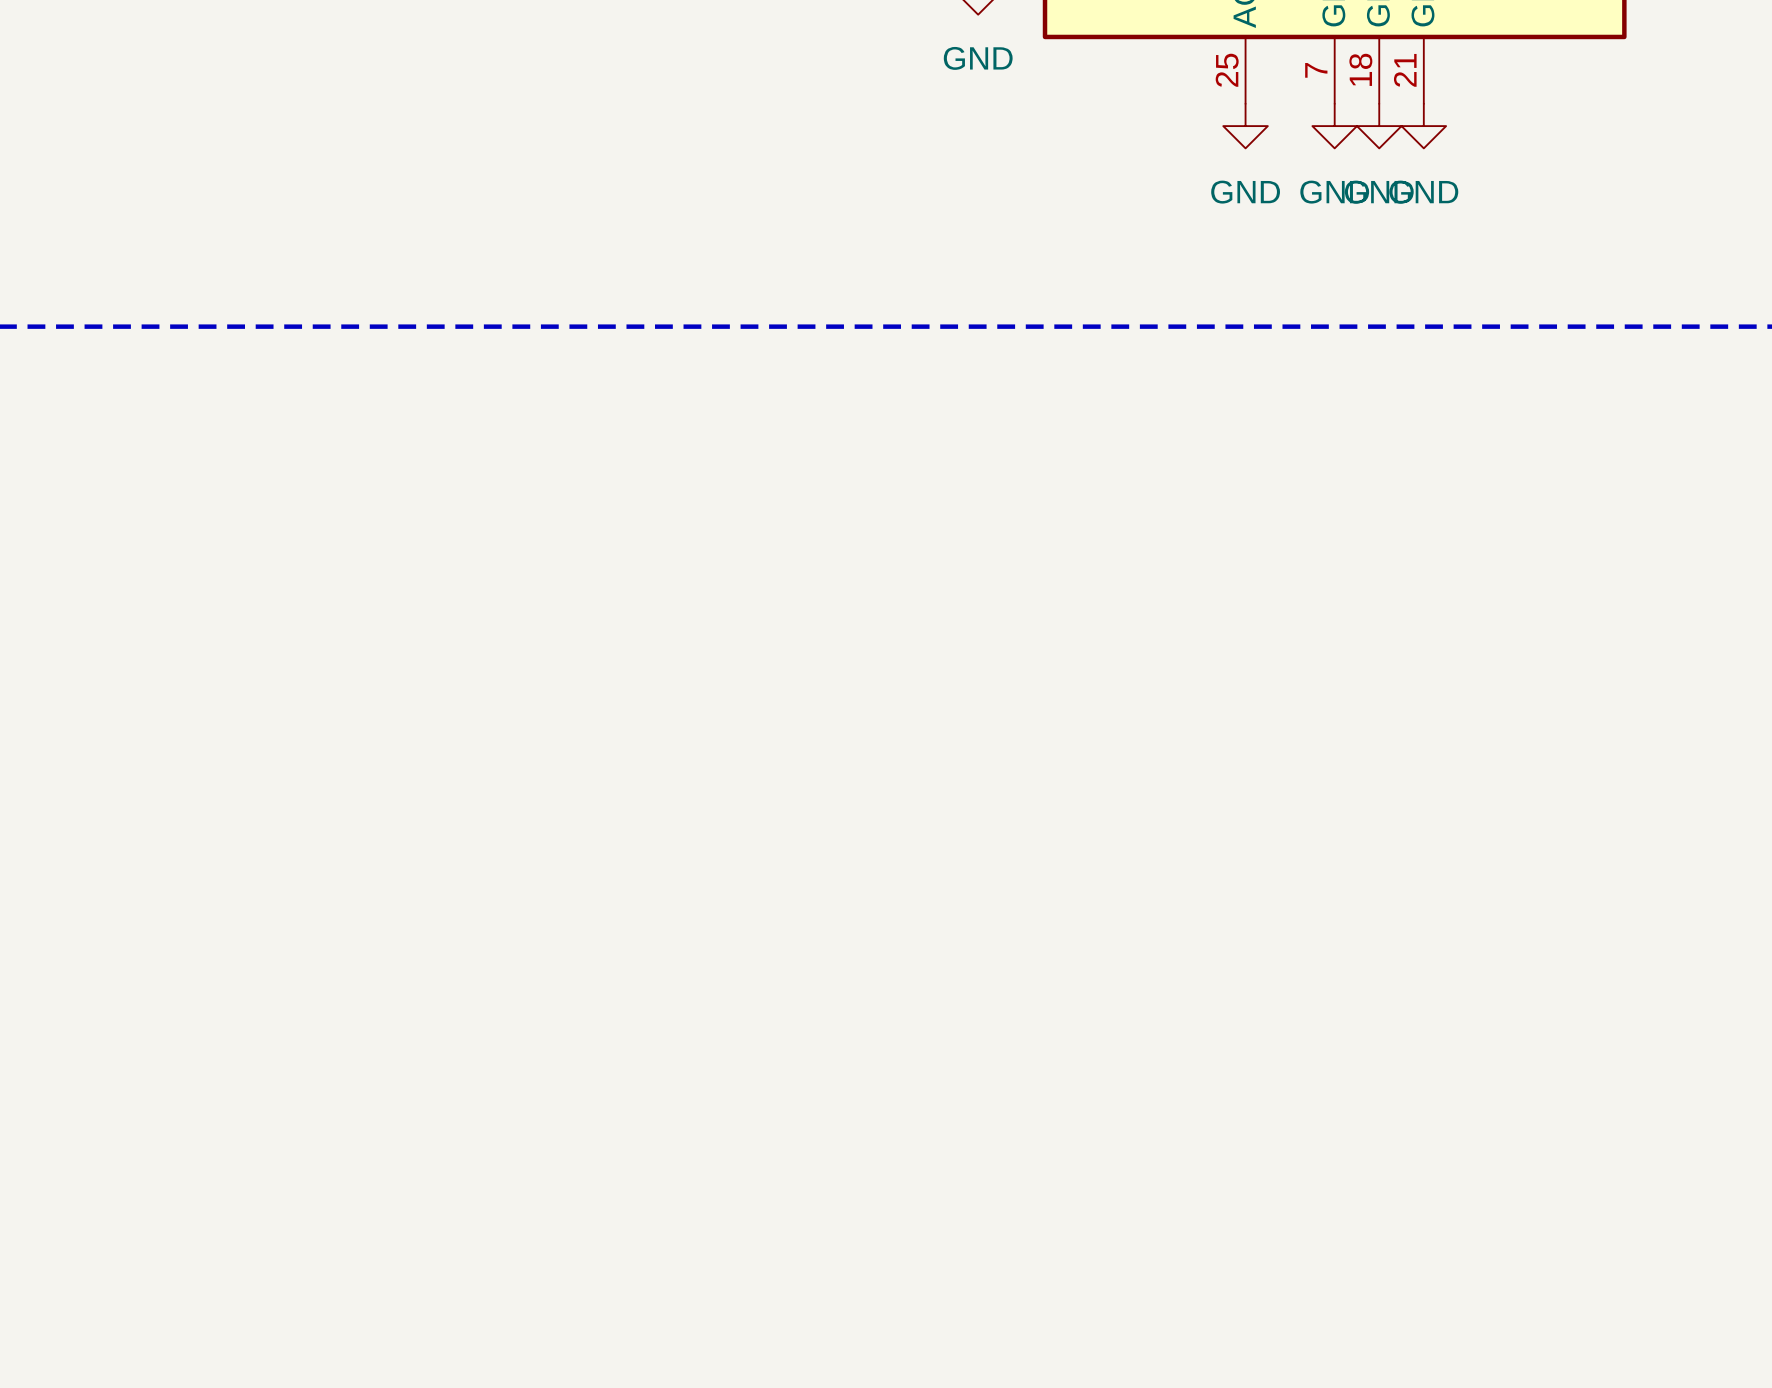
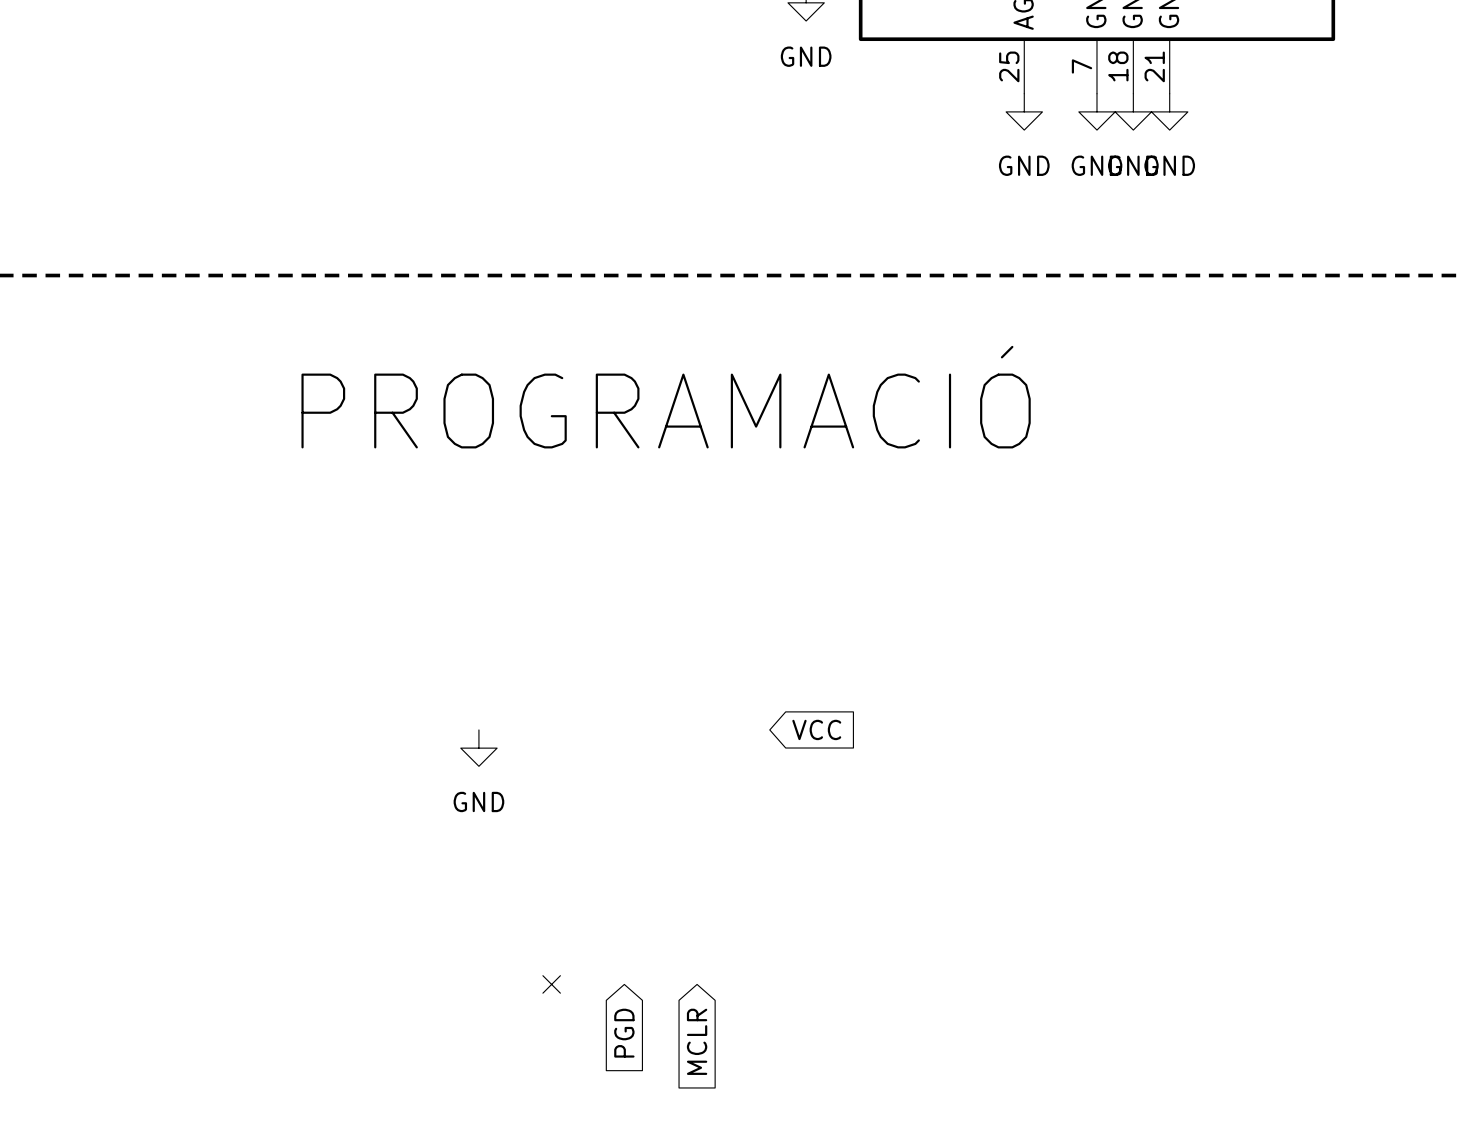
text: none -> PROGRAMACIÓ (666, 397)
global label: none -> VCC (816, 729)
power symbol: none -> GND (478, 748)
no-connect mark: none -> (551, 984)
global label: none -> PGD (624, 1033)
global label: none -> MCLR (697, 1041)

